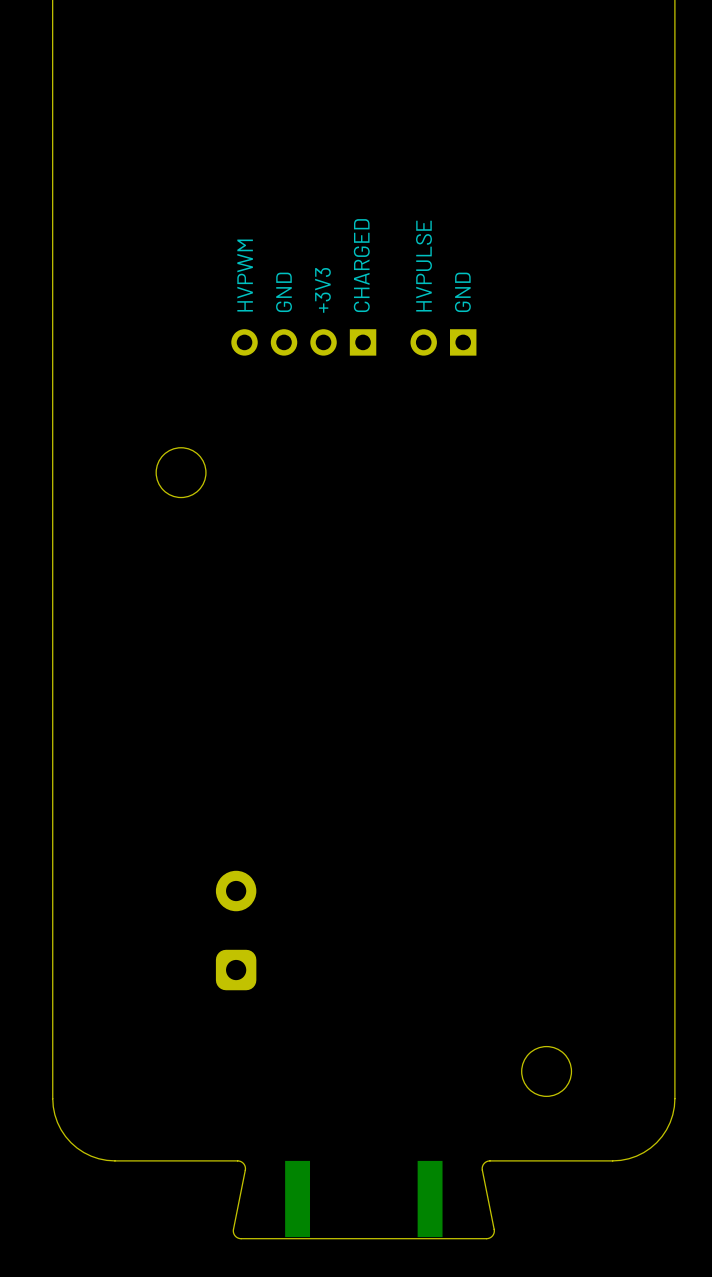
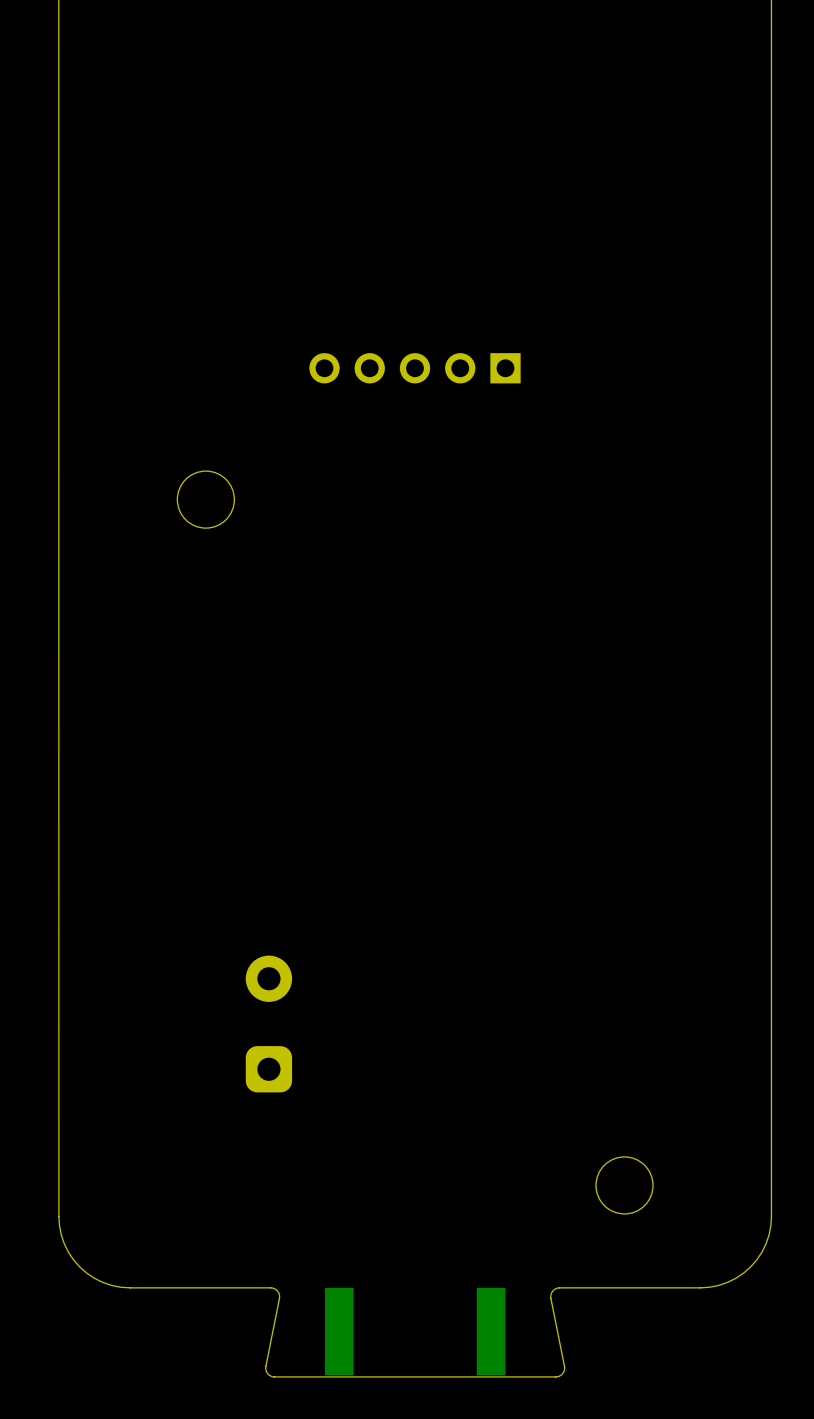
text: CHARGED (361, 265) -> none
text: HVPULSE (423, 266) -> none
text: HVPWM (245, 275) -> none
text: +3V3 (322, 290) -> none
text: GND (283, 292) -> none
text: GND (462, 292) -> none
part: (303, 342) -> none
part: (443, 342) -> none
part: none -> (415, 368)

